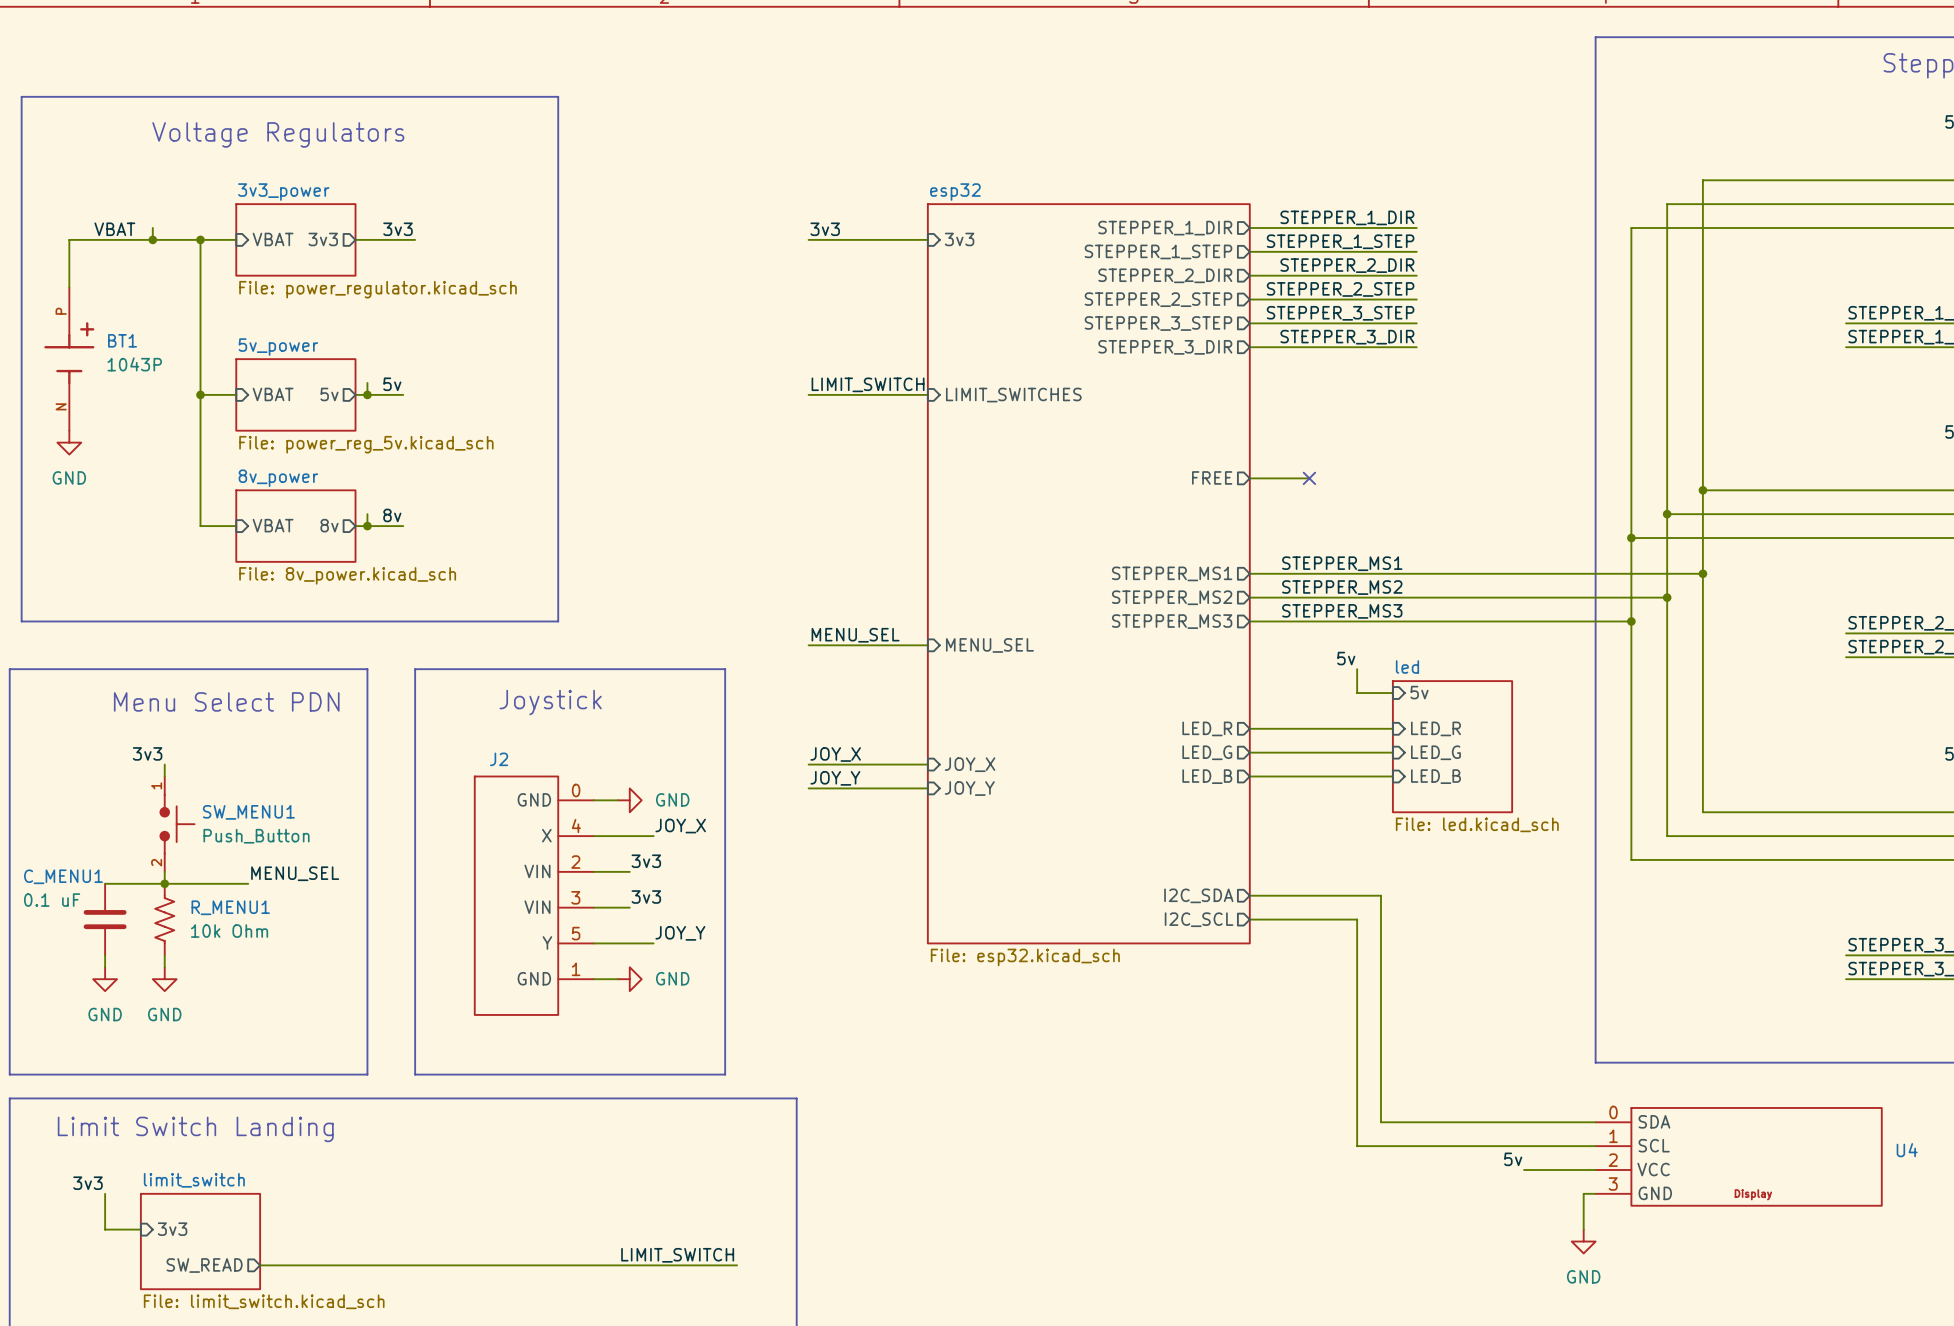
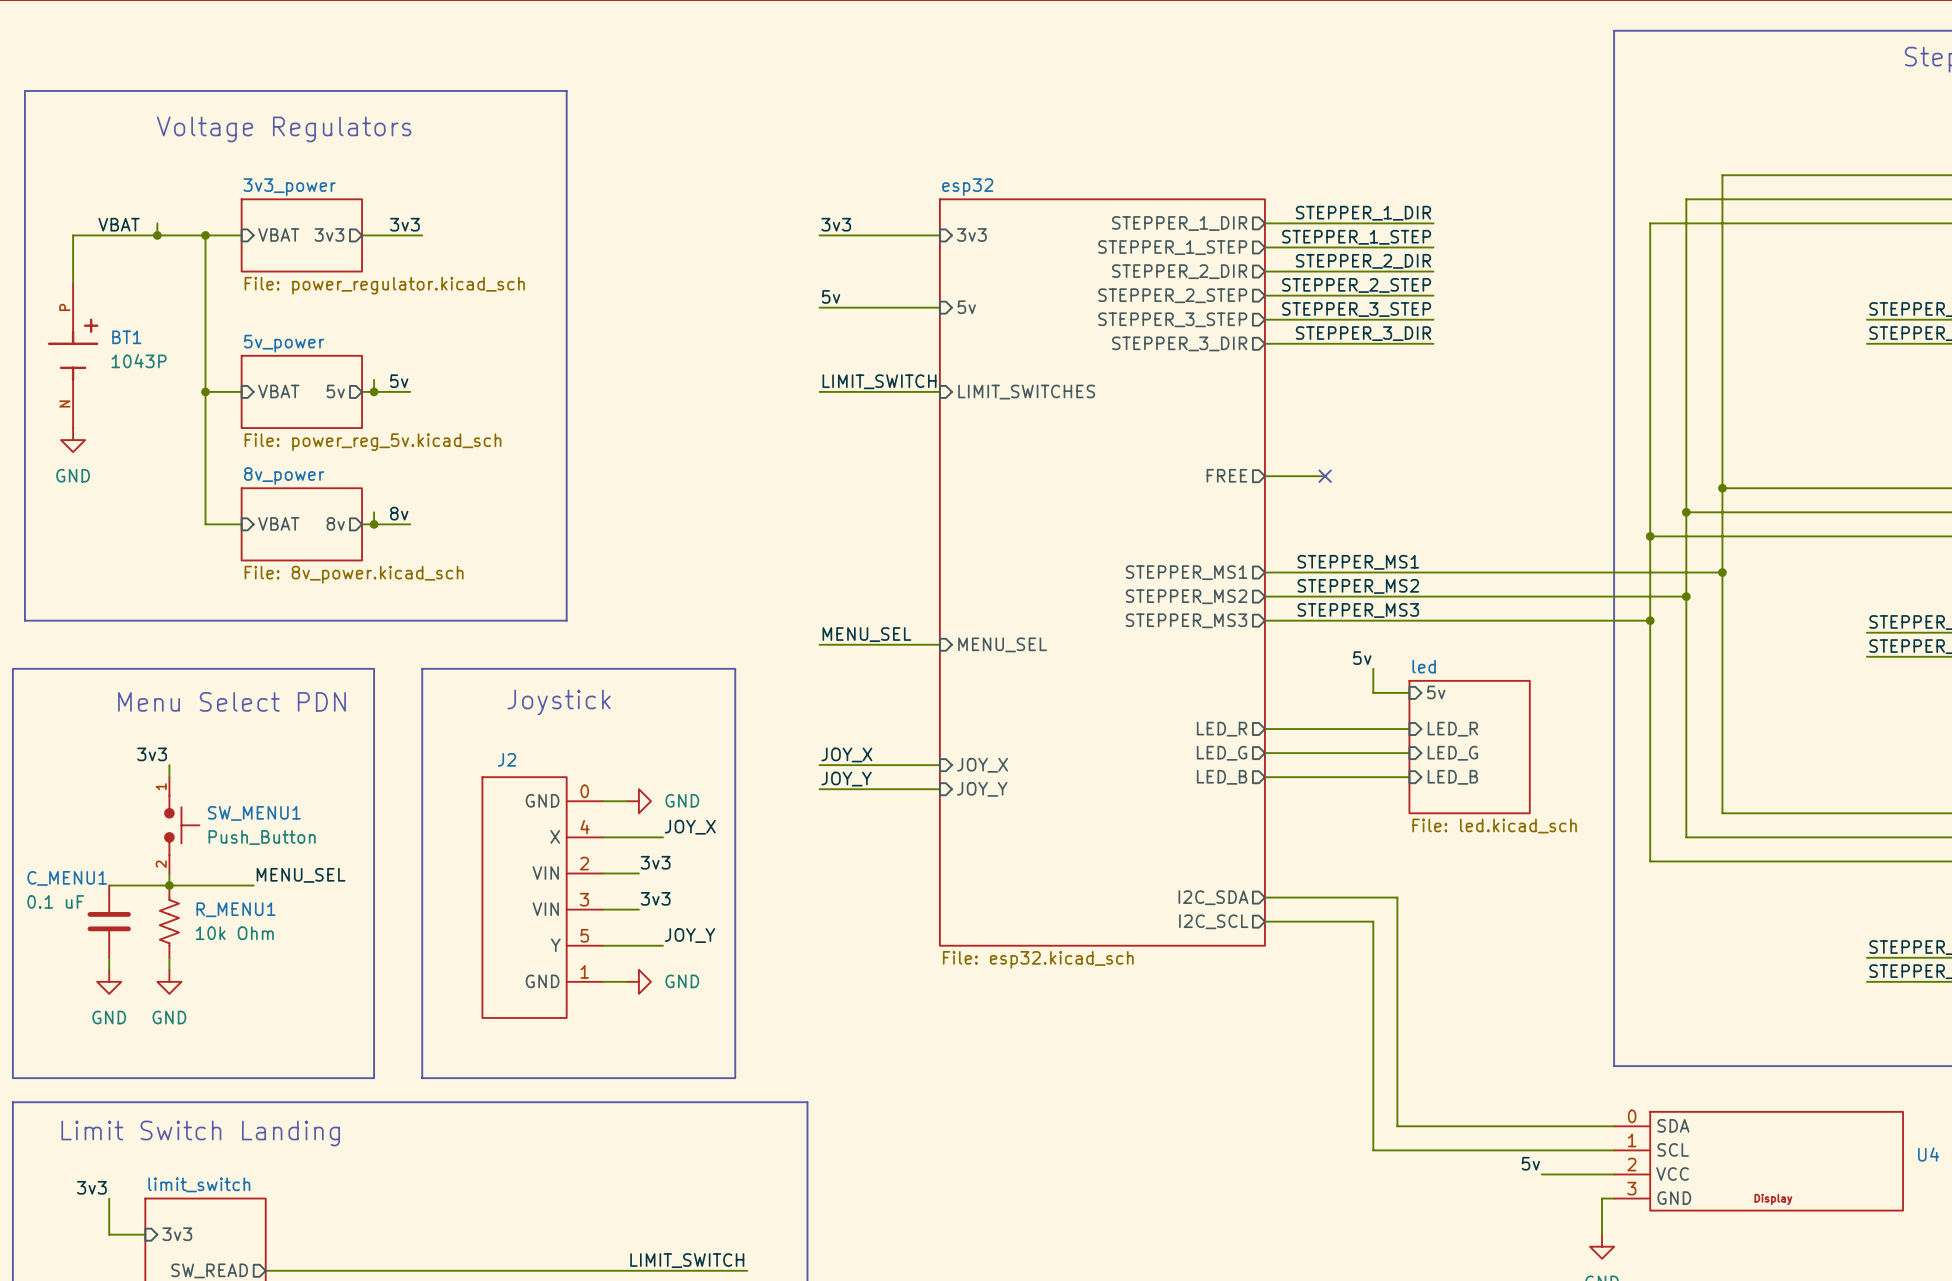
label: none -> 5v (831, 296)
wire: none -> (819, 307) (939, 307)
sheet pin: none -> 5v (966, 307)

